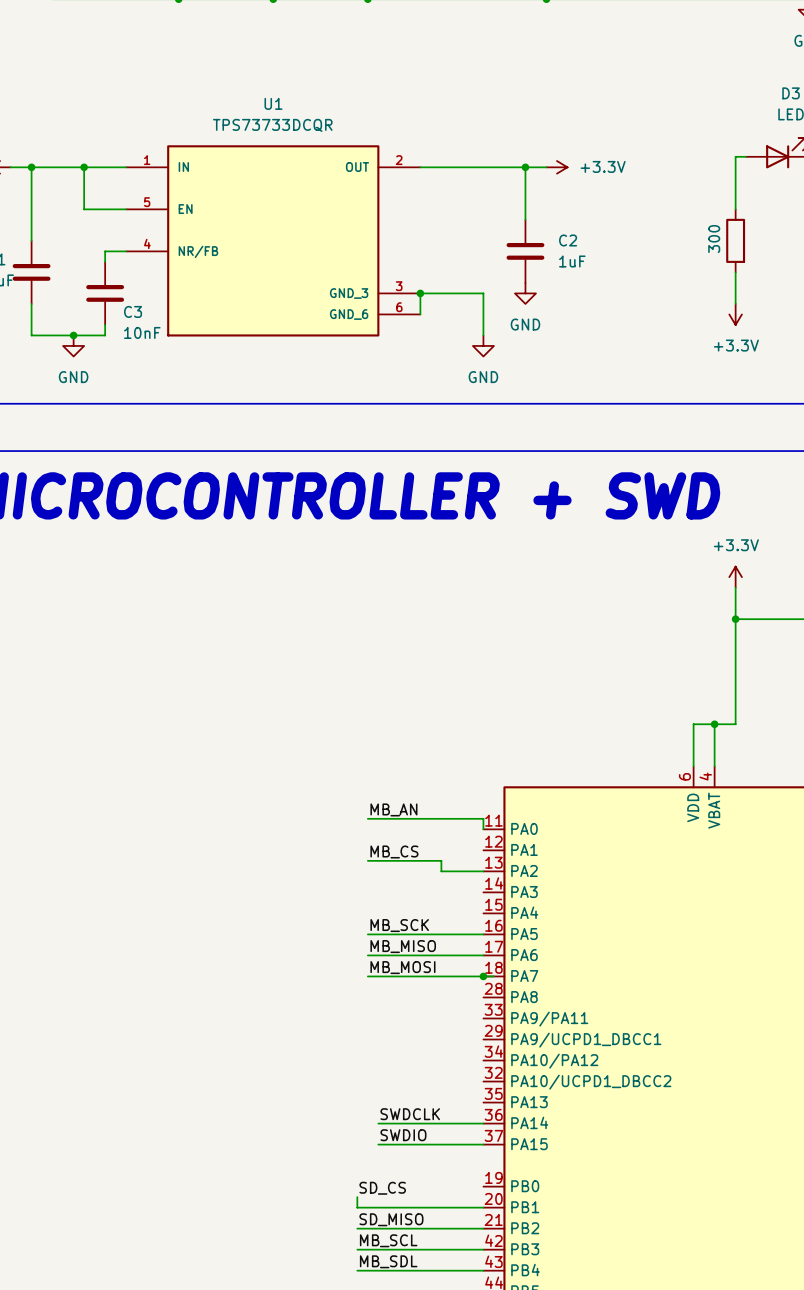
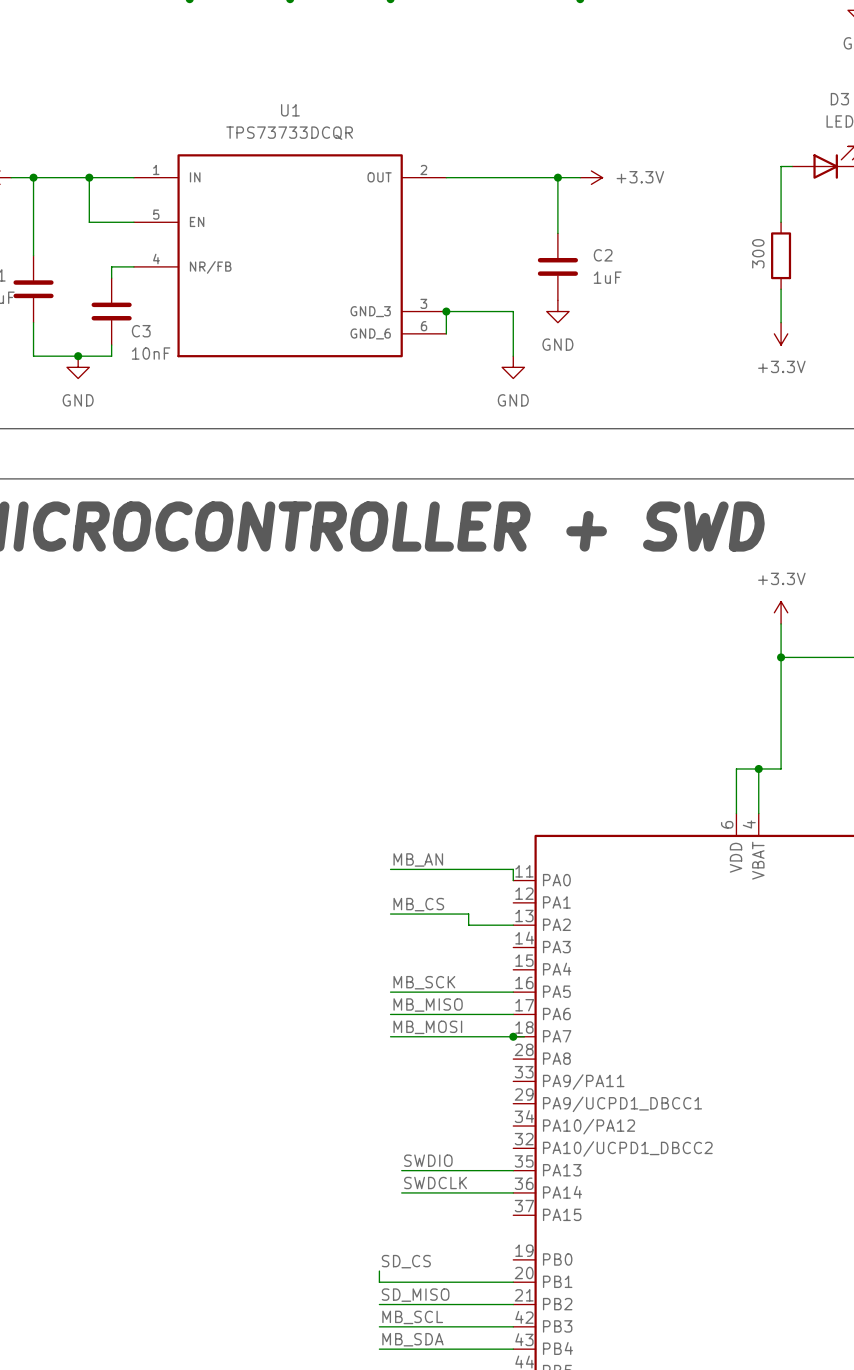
label position: SWDIO (403, 1135) -> SWDIO (428, 1160)
wire: (378, 1144) (483, 1144) -> (401, 1170) (513, 1170)
label: MB_SDL (388, 1261) -> MB_SDA (412, 1339)

